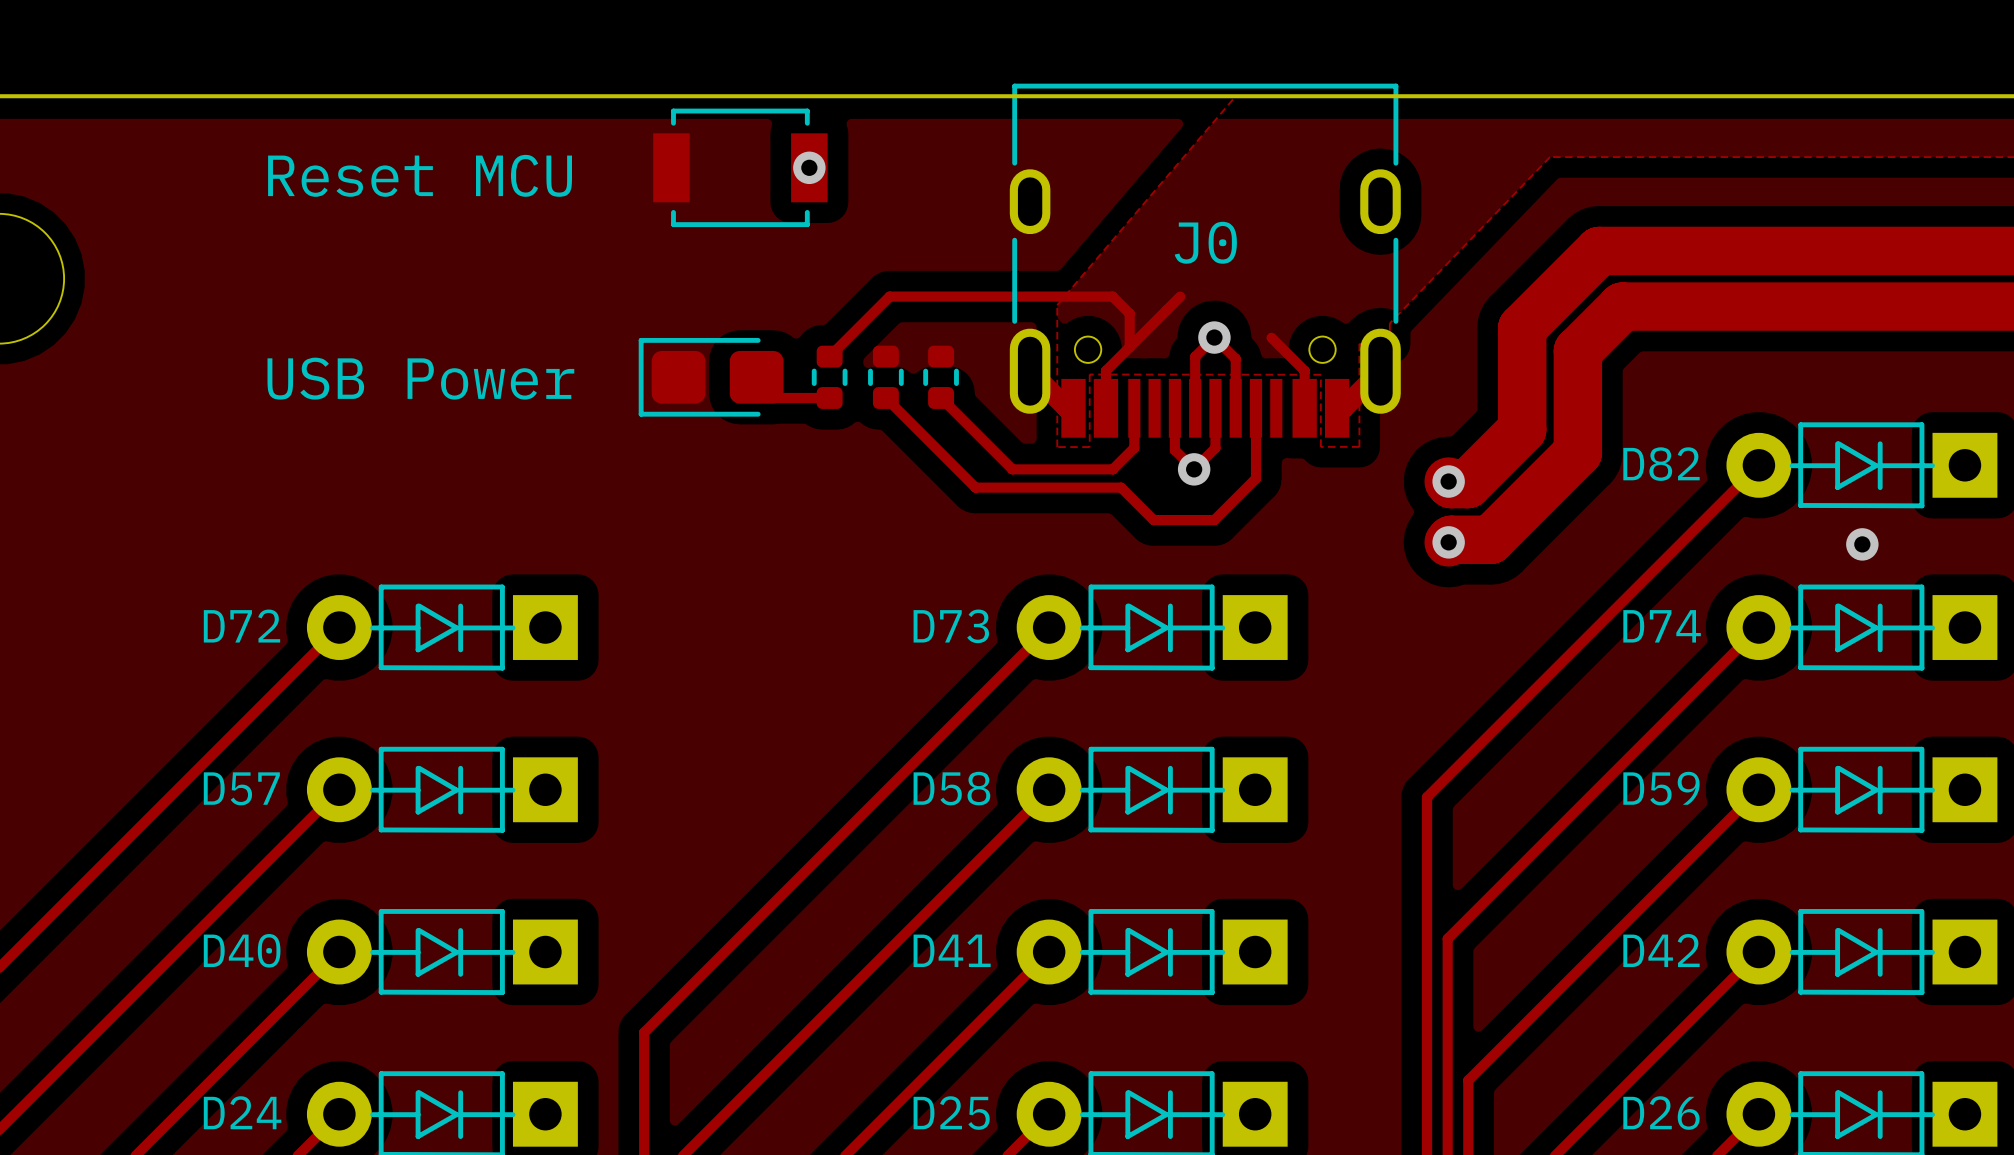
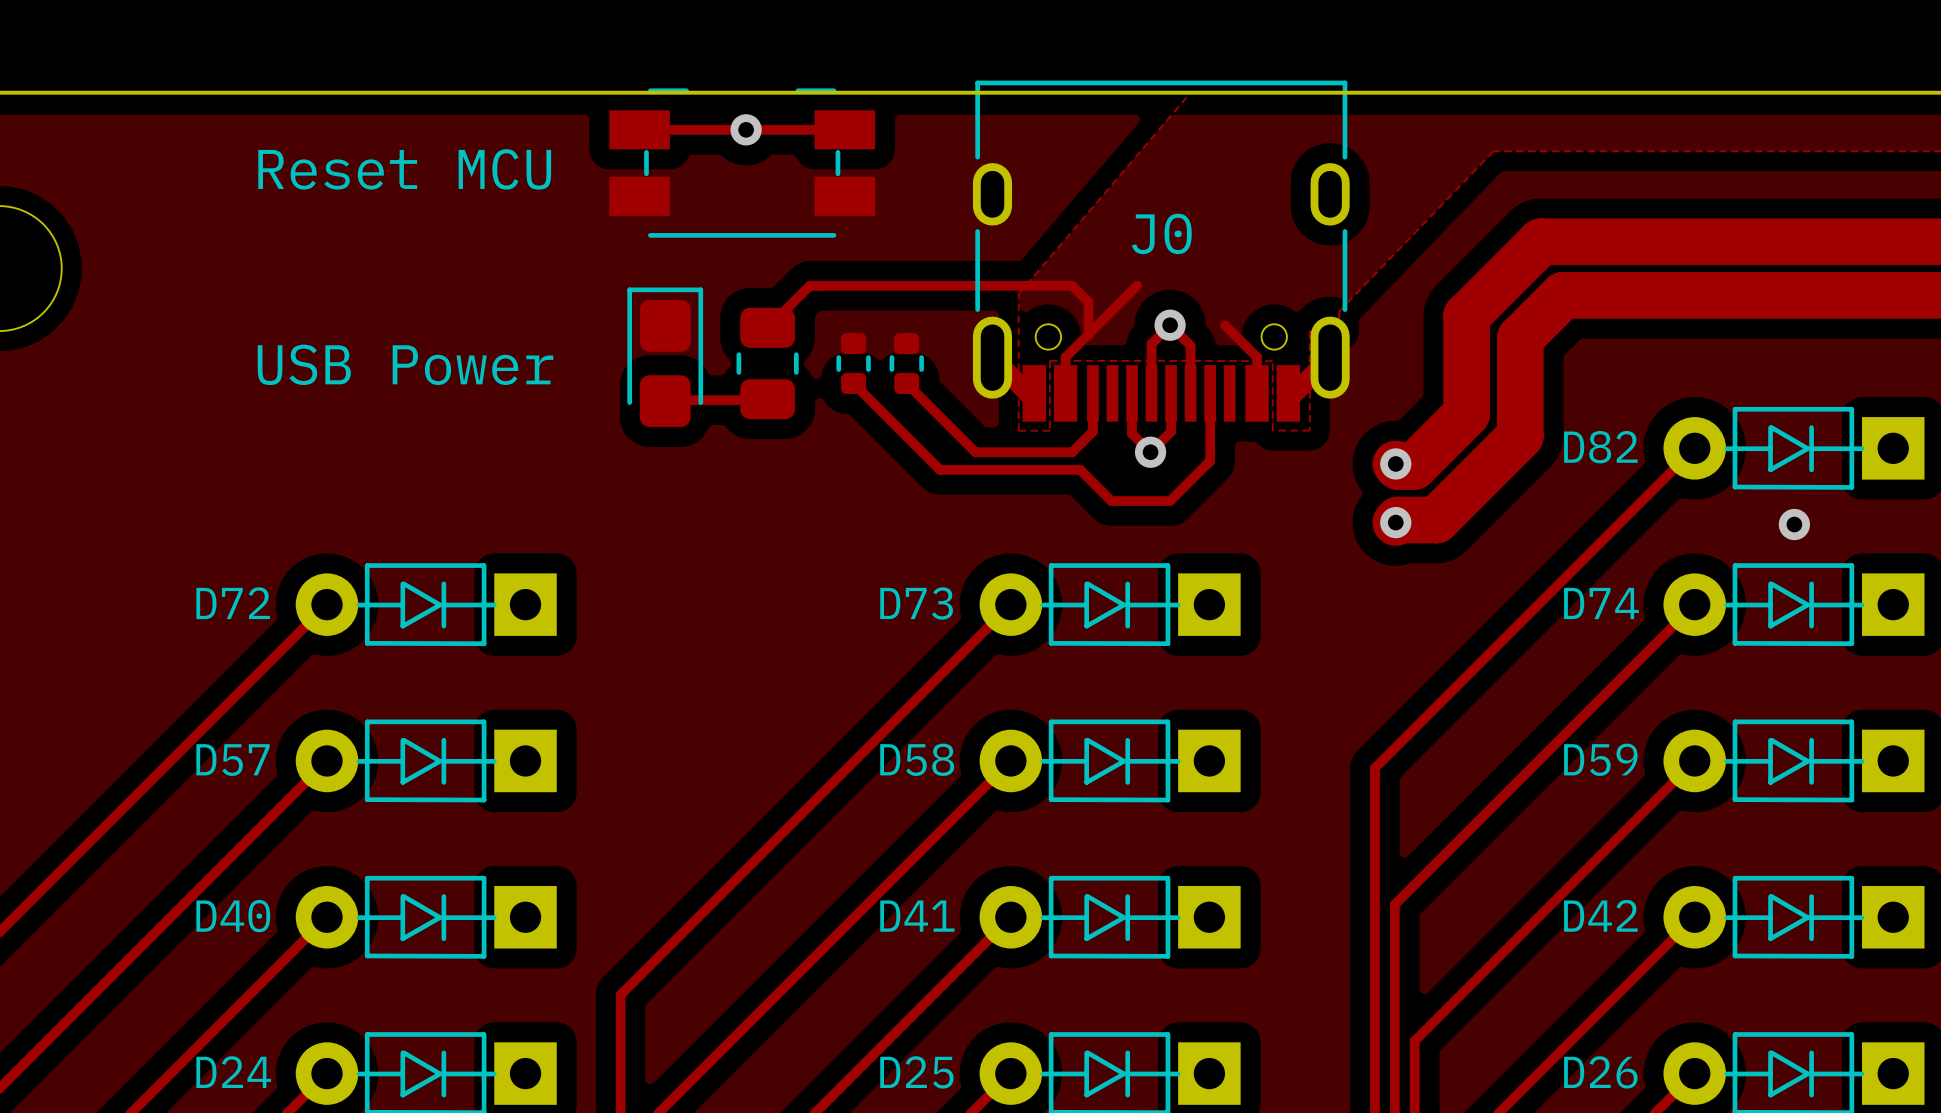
part footprint: [653, 108, 828, 228] -> [609, 88, 876, 238]
track: none -> (639, 129) (844, 129)
via position: (809, 167) -> (746, 129)
track: (889, 296) (829, 356) -> (857, 285) (809, 285) (767, 327)
part footprint: [811, 345, 848, 409] -> [736, 307, 799, 420]
part rotation: 0° (711, 377) -> 90° clockwise (665, 357)
track: (756, 377) (777, 397) (829, 397) -> none
track: none -> (665, 400) (766, 400)

